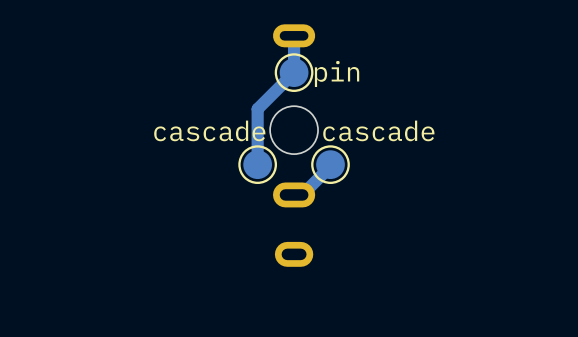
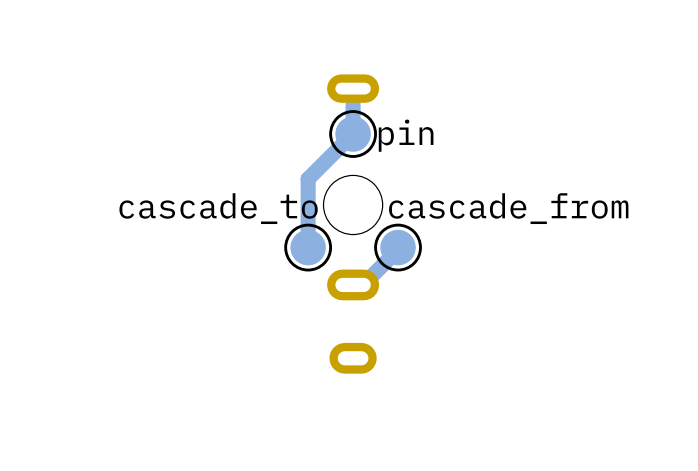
text: cascade (209, 130) -> cascade_to (218, 208)
text: cascade (378, 130) -> cascade_from (508, 208)

